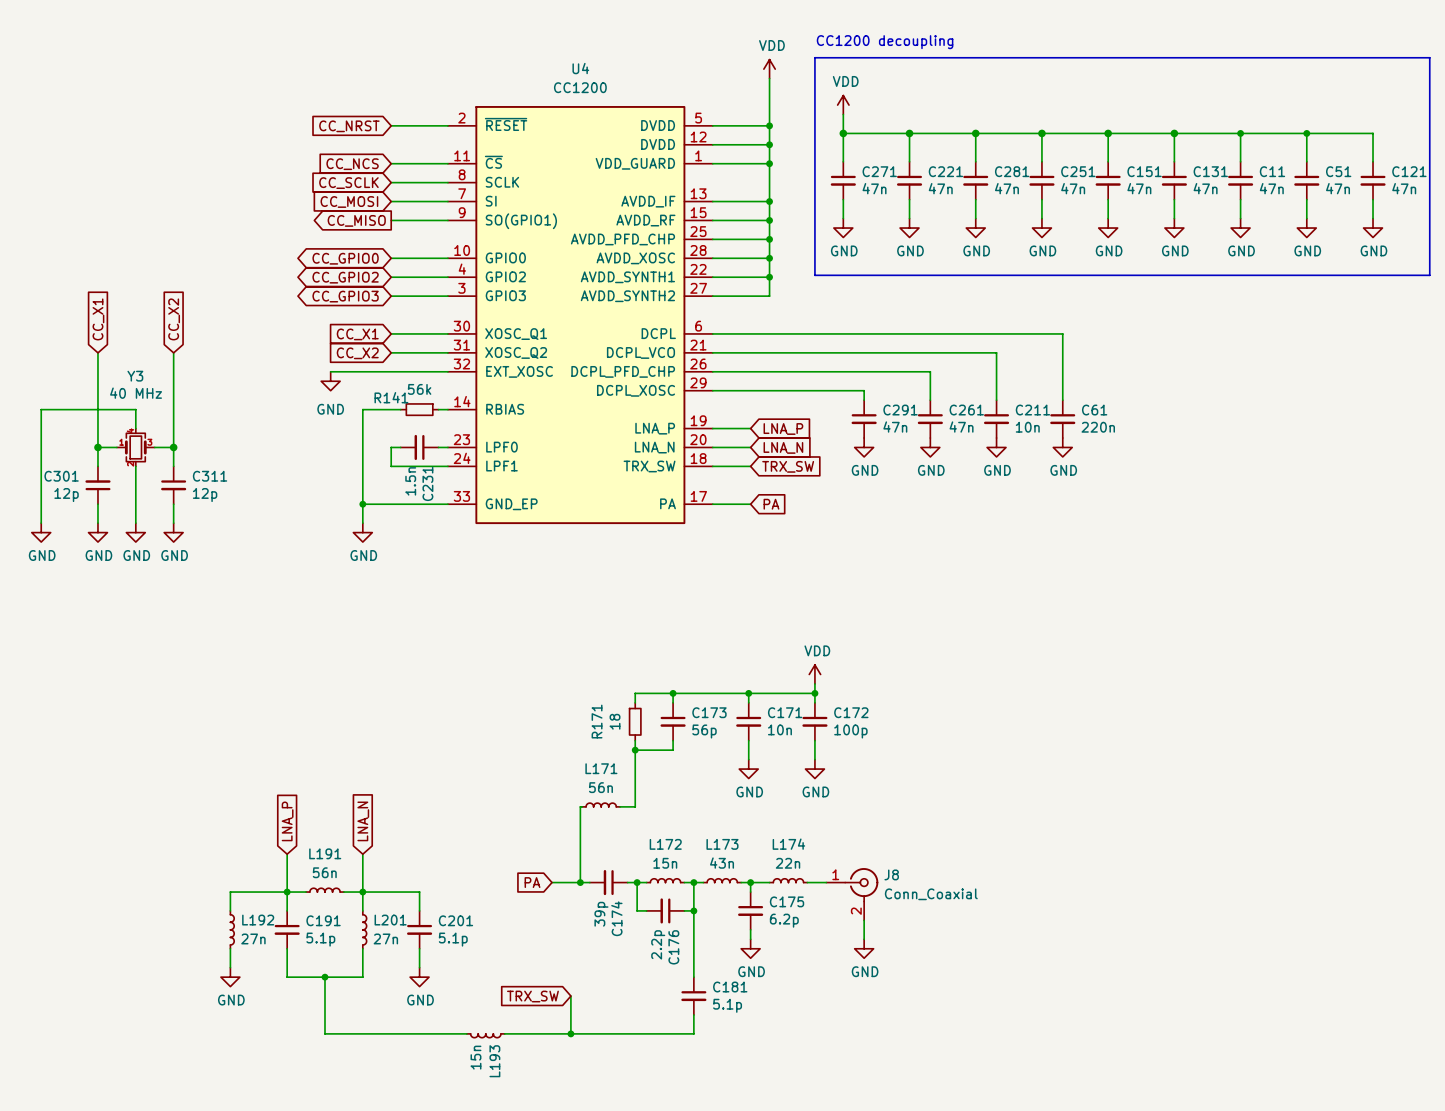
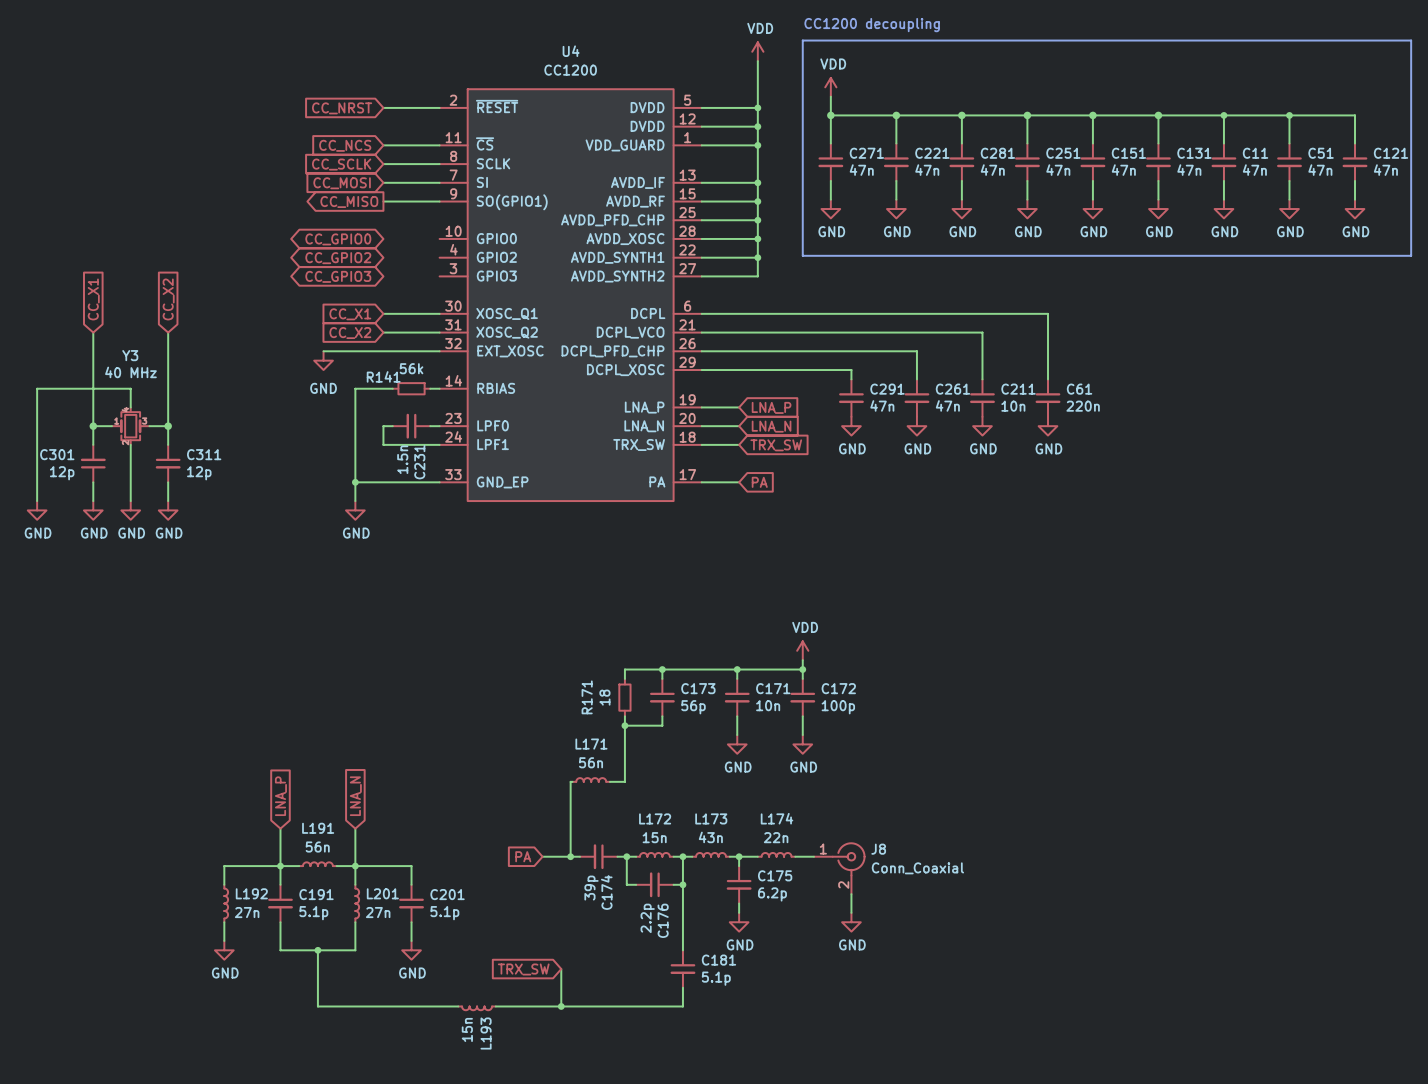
wire: (391, 258) (447, 258) -> none
wire: (391, 277) (447, 277) -> none
wire: (391, 296) (447, 296) -> none

